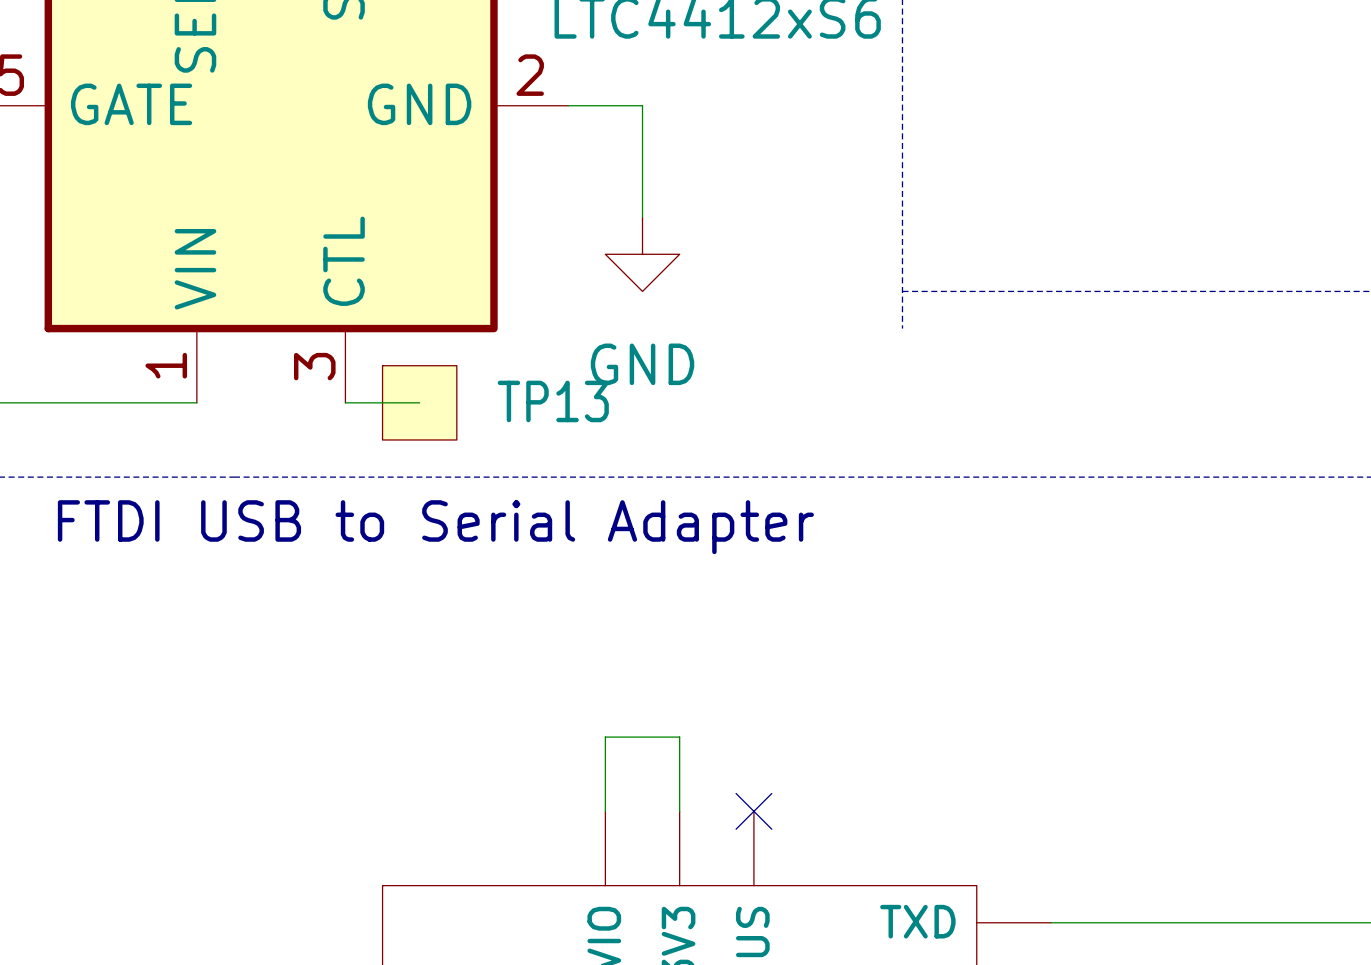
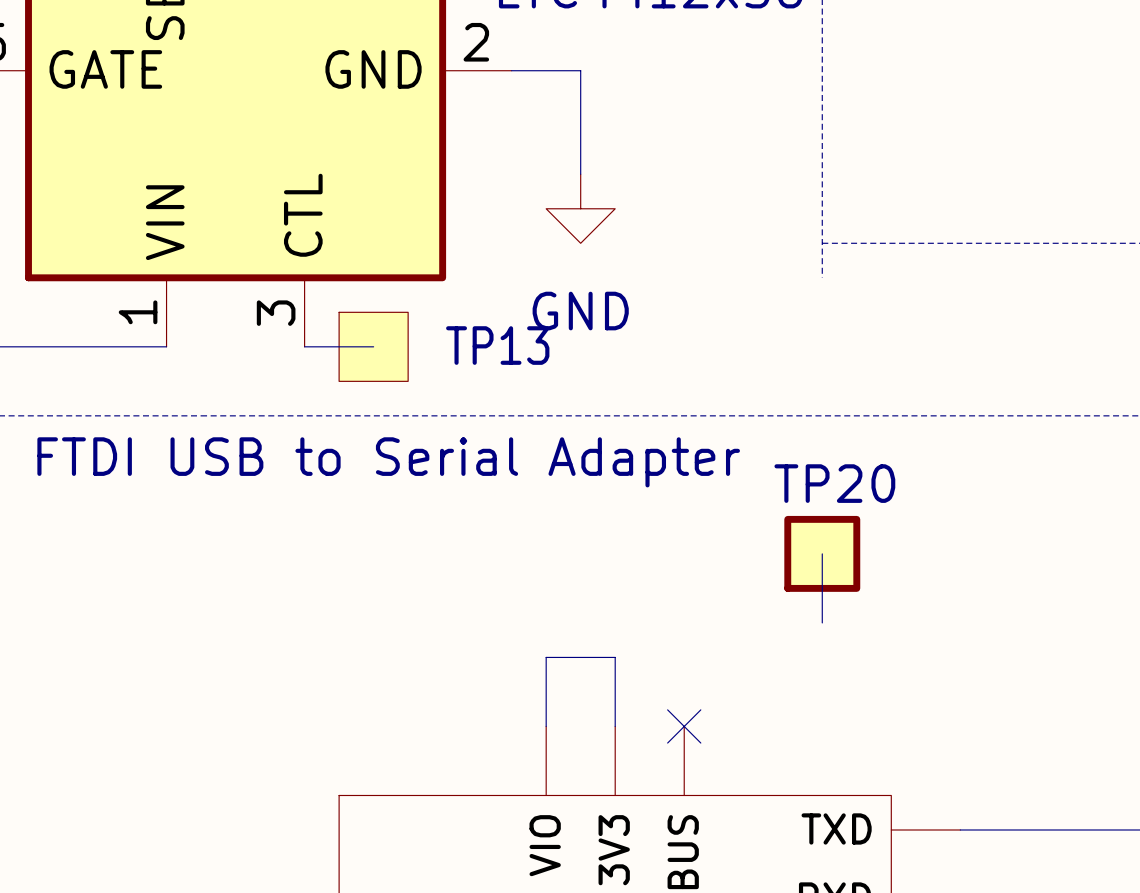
wire: none -> (822, 553) (822, 622)
TP20: none -> (822, 553)

